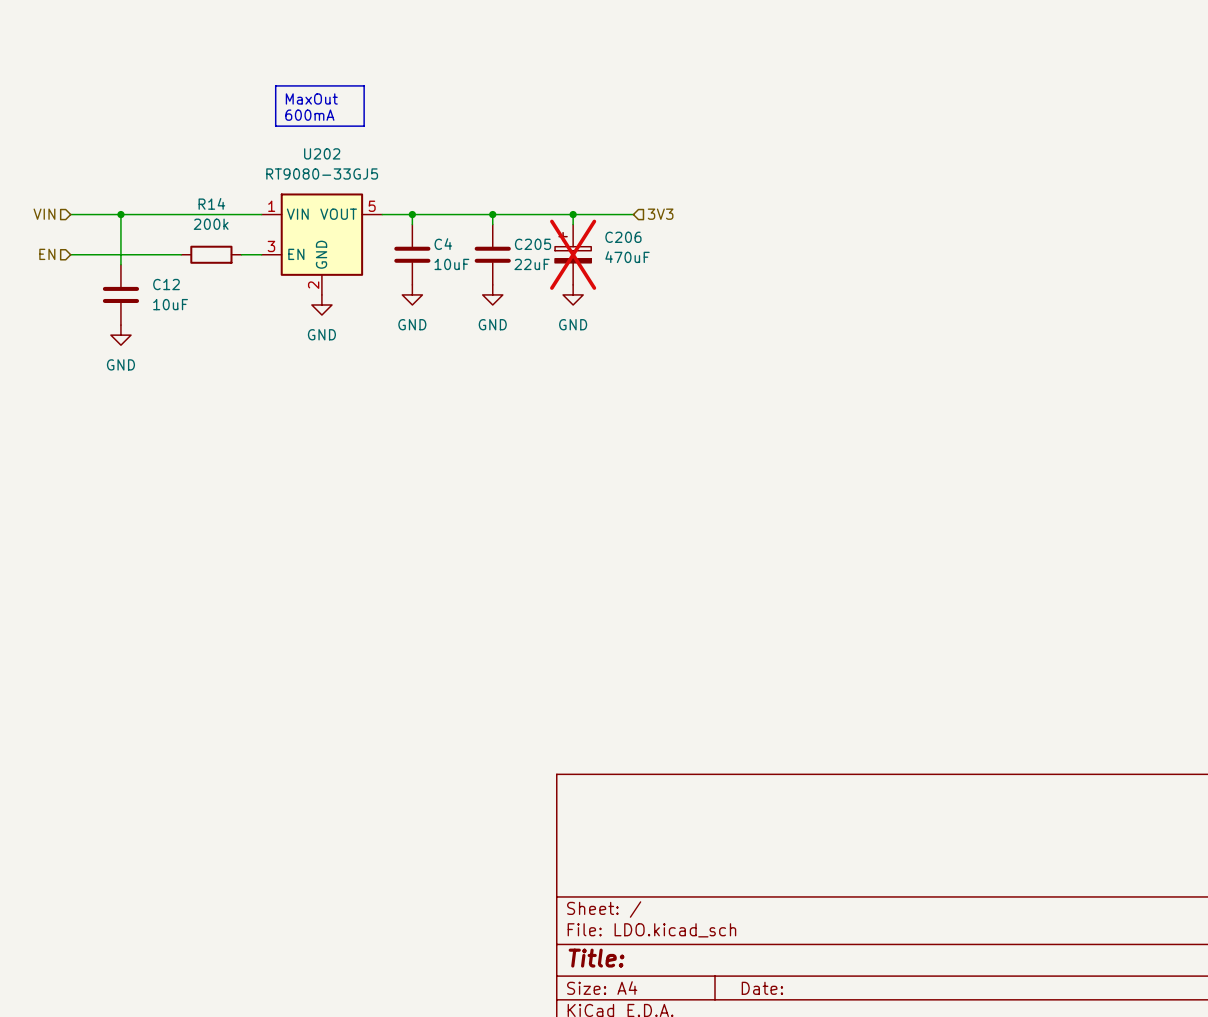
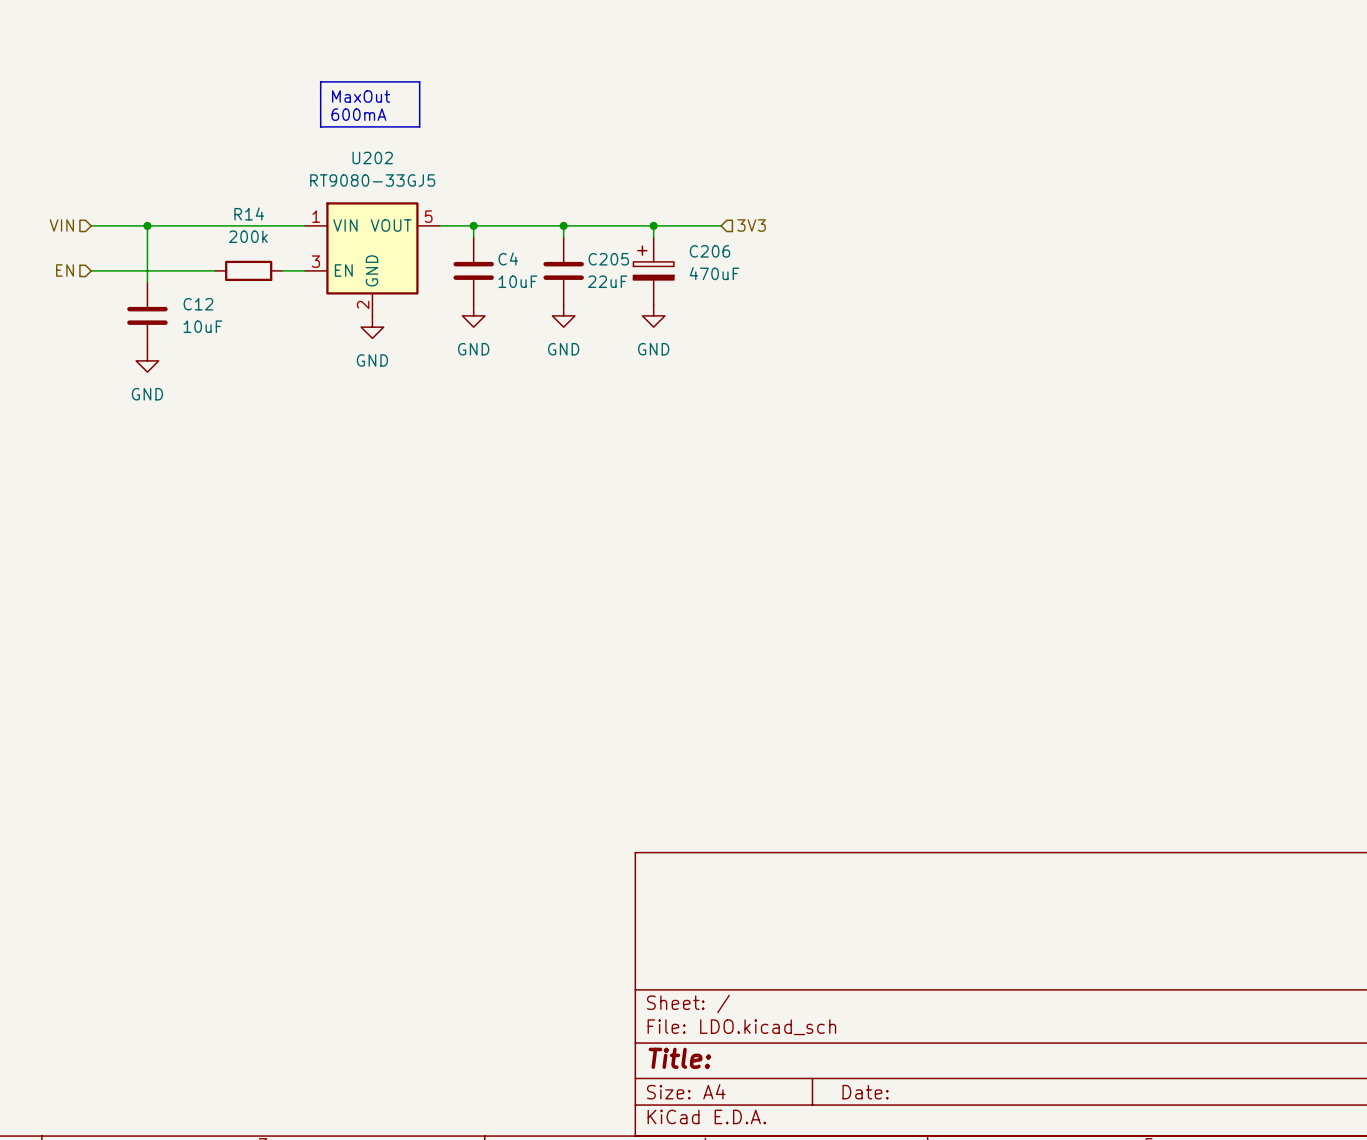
C206 do-not-place cross: (573, 254) -> none

